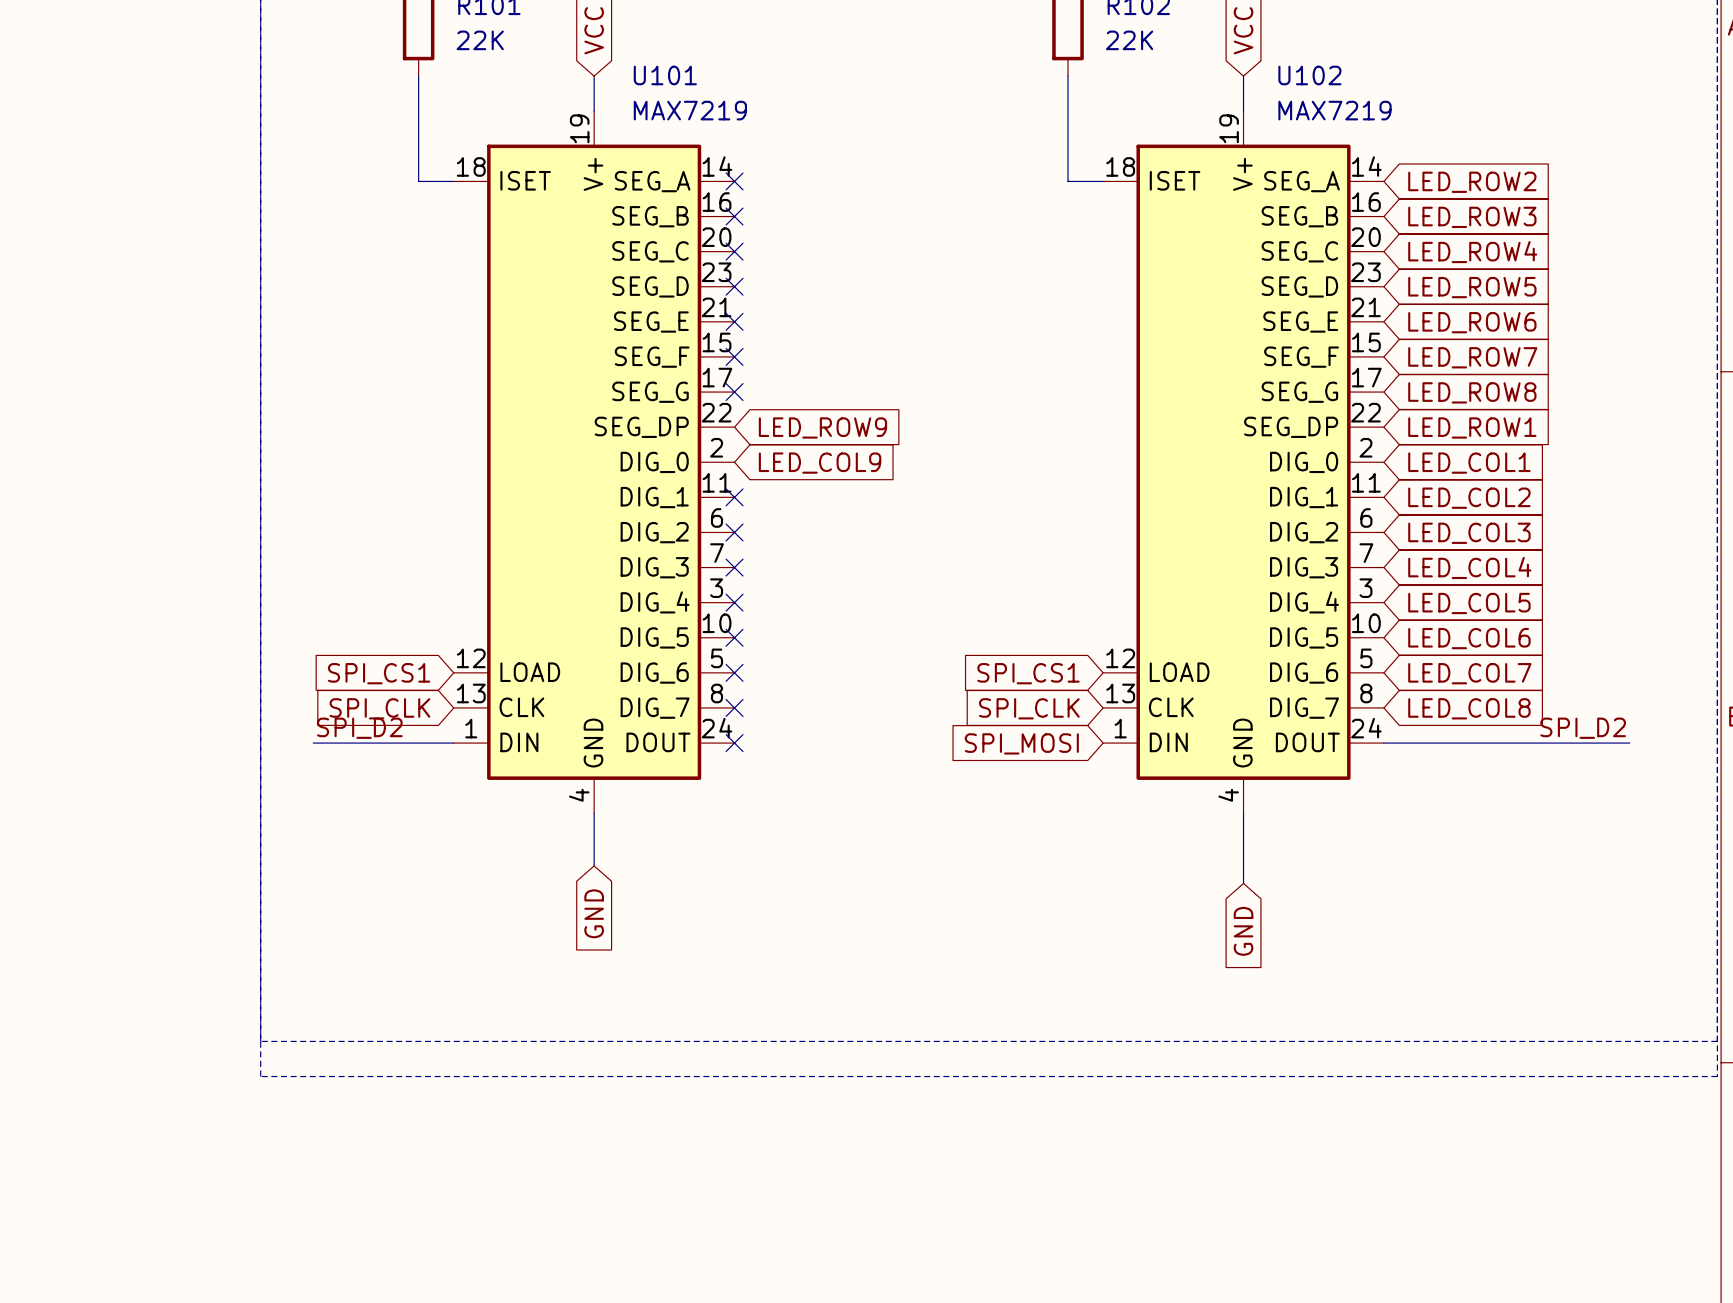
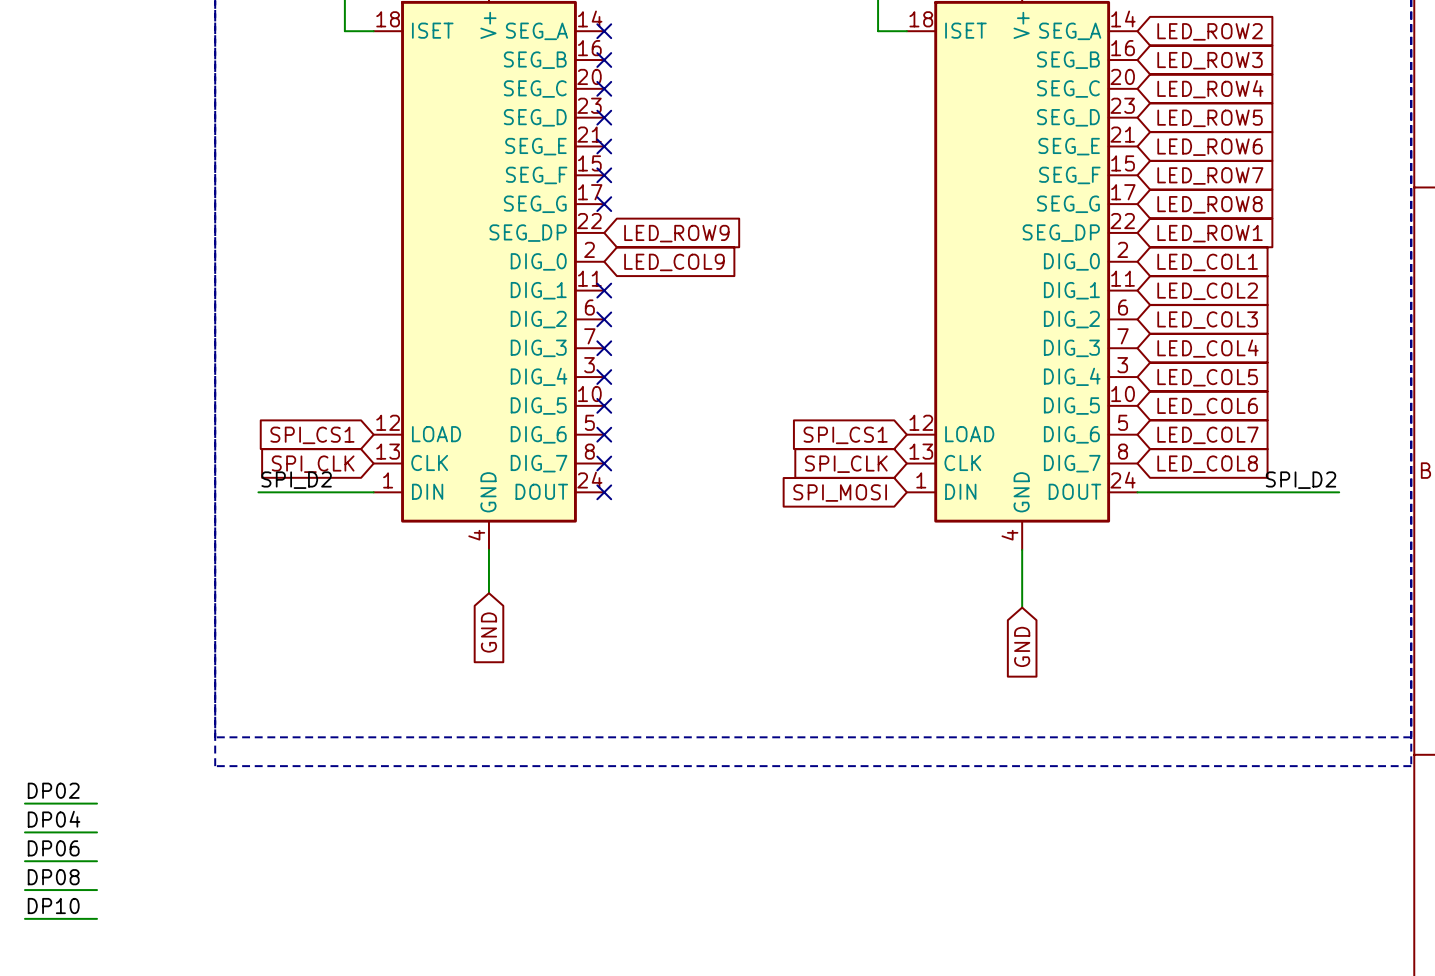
label: none -> DP02 (53, 790)
wire: none -> (24, 803) (97, 803)
label: none -> DP04 (54, 819)
wire: none -> (24, 832) (97, 832)
label: none -> DP06 (53, 848)
wire: none -> (24, 861) (97, 861)
label: none -> DP08 (53, 877)
wire: none -> (24, 890) (97, 890)
label: none -> DP10 (53, 906)
wire: none -> (24, 918) (97, 918)

